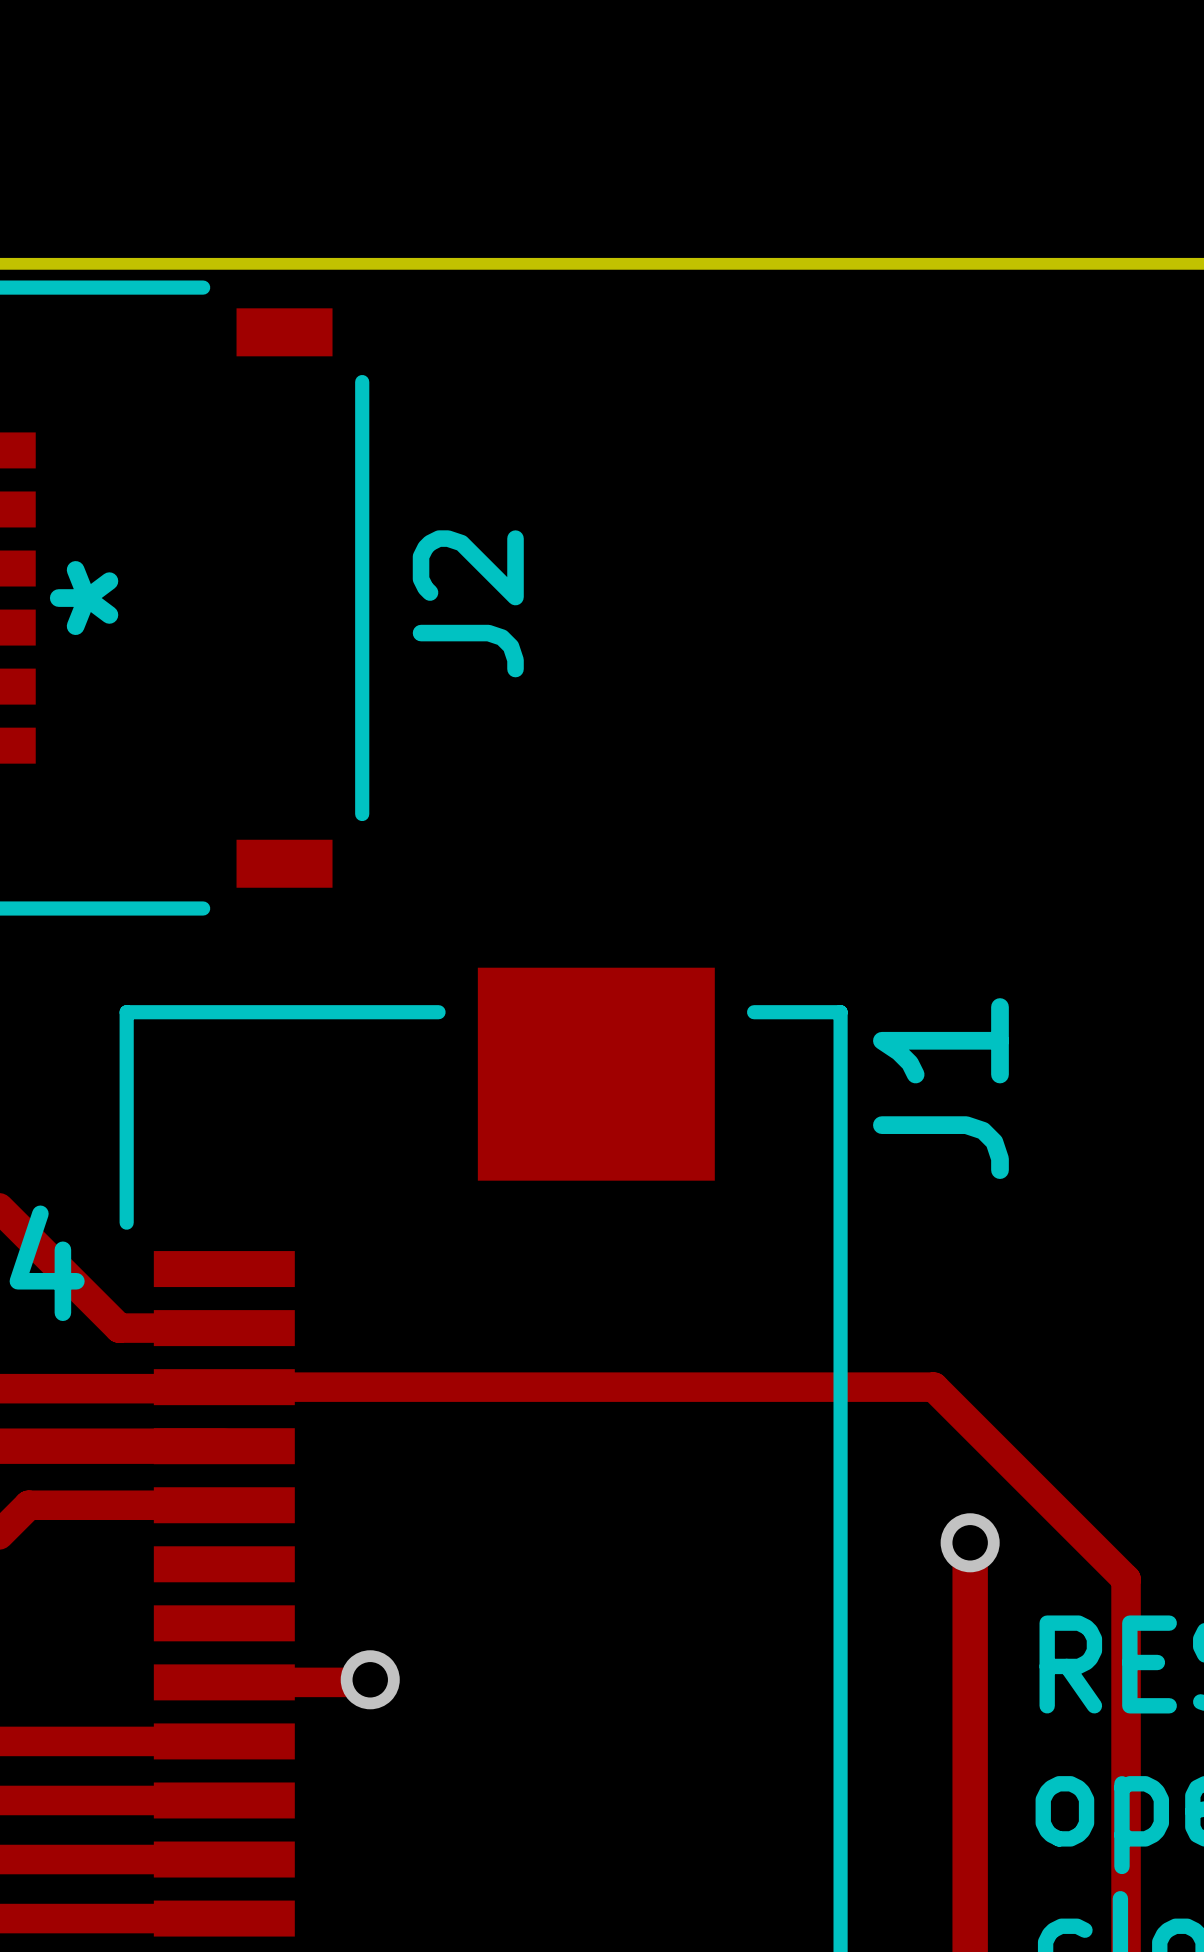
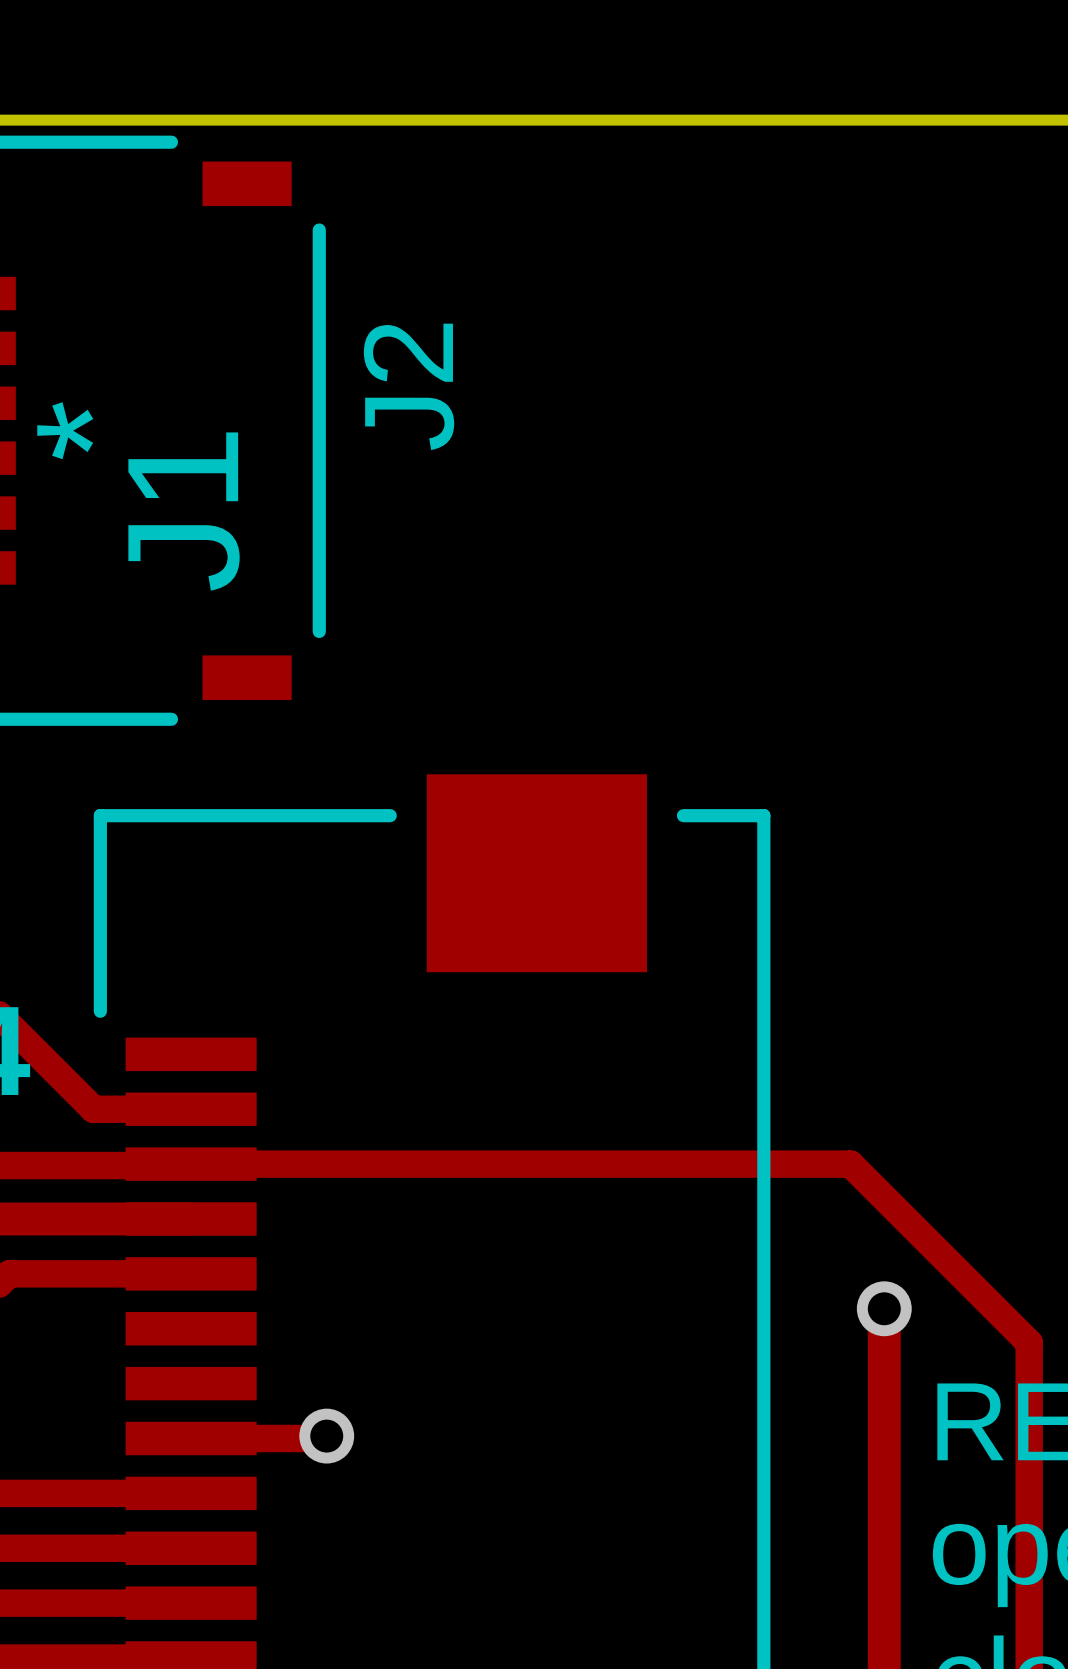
J2 name position: J2 (468, 603) -> J2 (409, 386)
J1 name position: J1 (940, 1088) -> J1 (184, 511)

